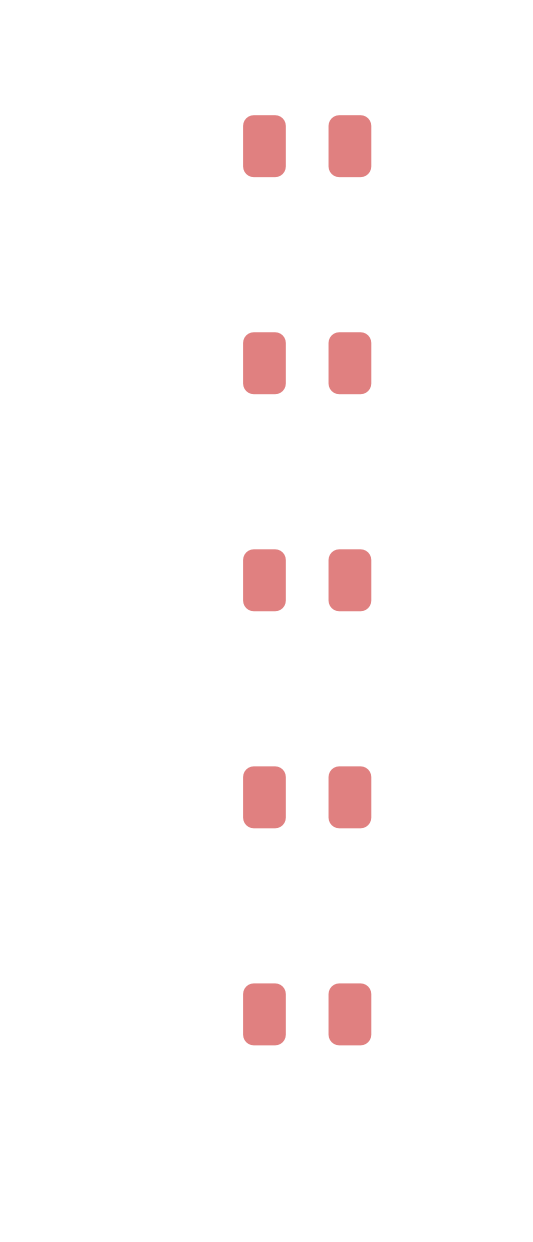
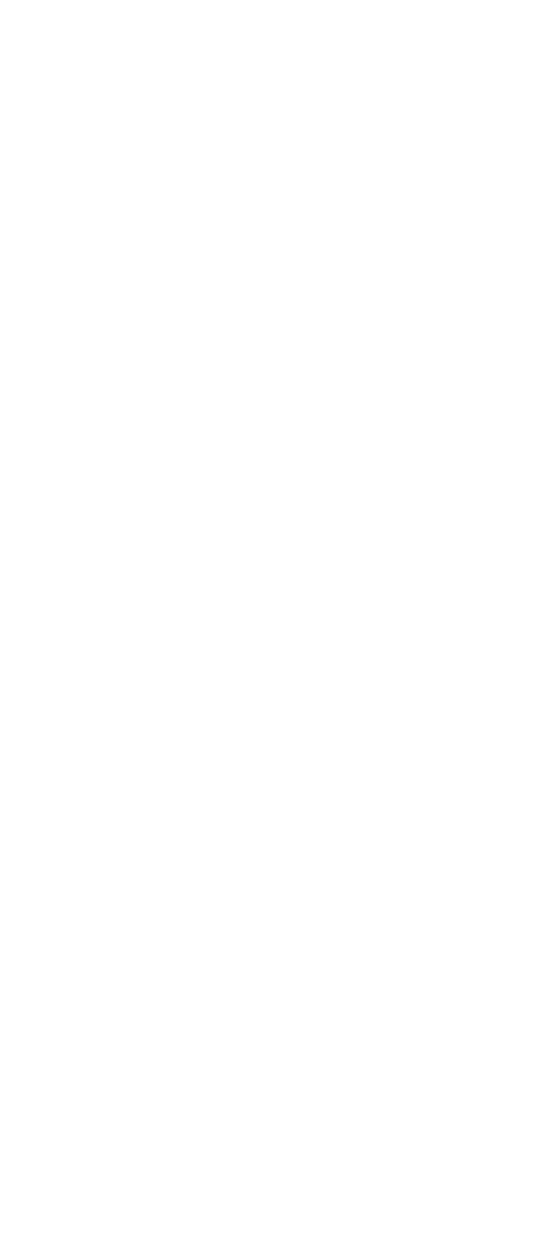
part: (307, 146) -> none
part: (307, 363) -> none
part: (307, 580) -> none
part: (307, 797) -> none
part: (307, 1014) -> none

